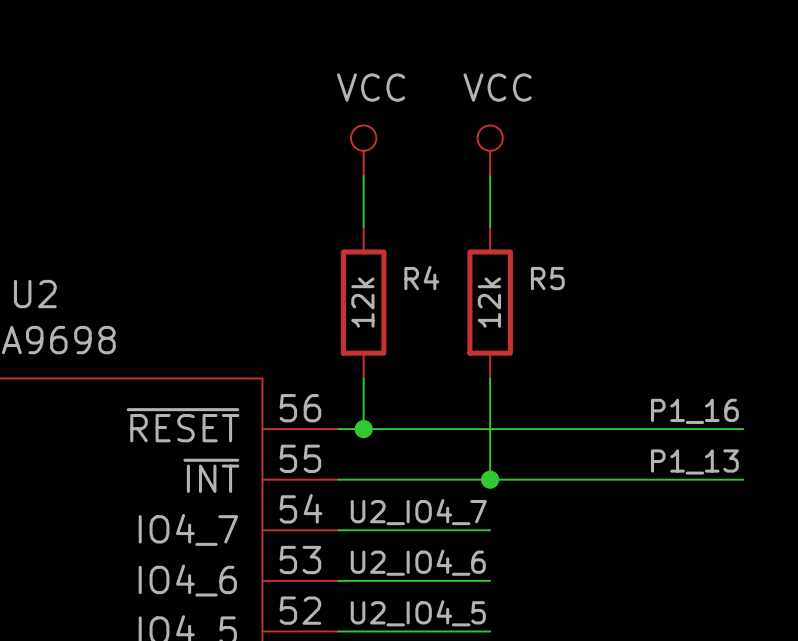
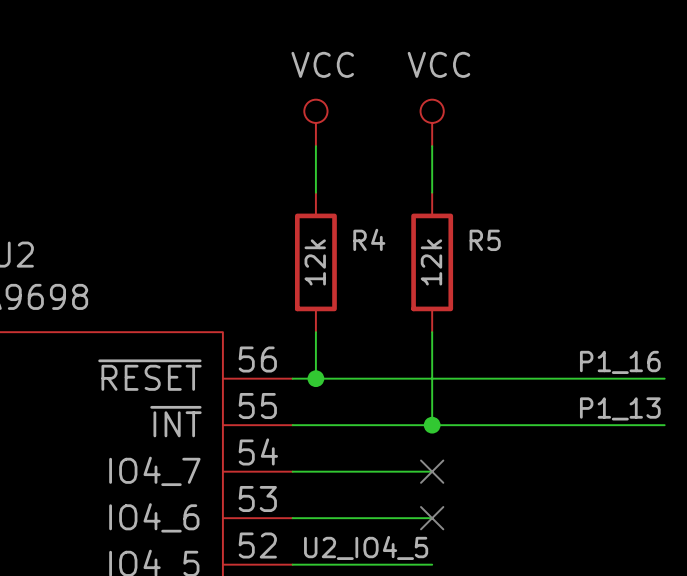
label: U2_IO4_7 (418, 512) -> none
no-connect mark: none -> (432, 471)
label: U2_IO4_6 (418, 562) -> none
no-connect mark: none -> (432, 518)

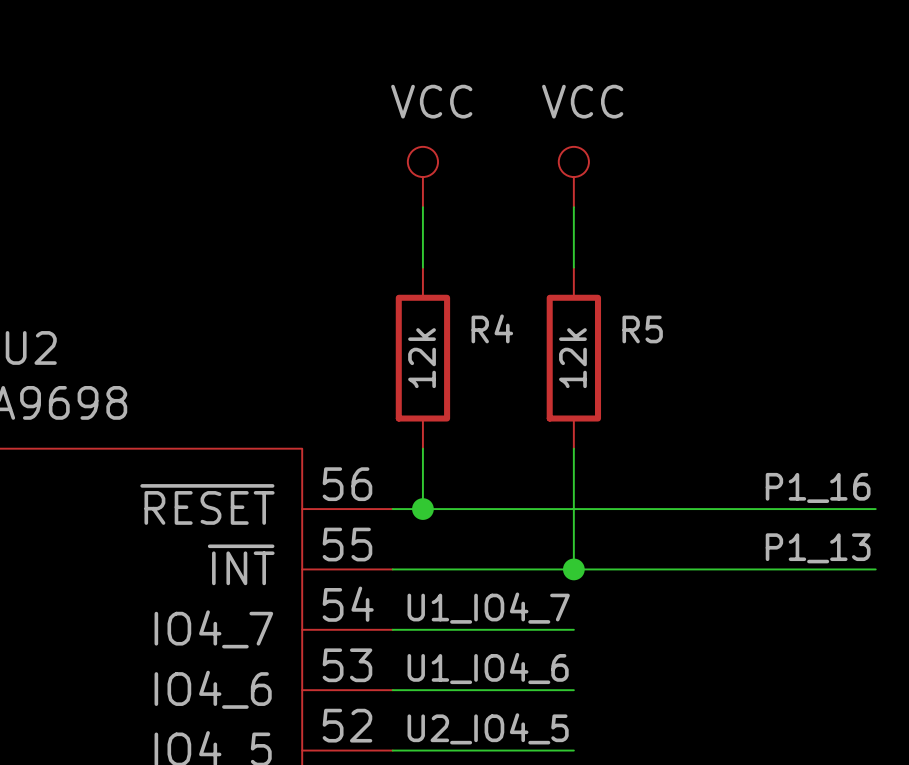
label: none -> U1_IO4_7 (488, 608)
no-connect mark: (432, 471) -> none
label: none -> U1_IO4_6 (488, 668)
no-connect mark: (432, 518) -> none

